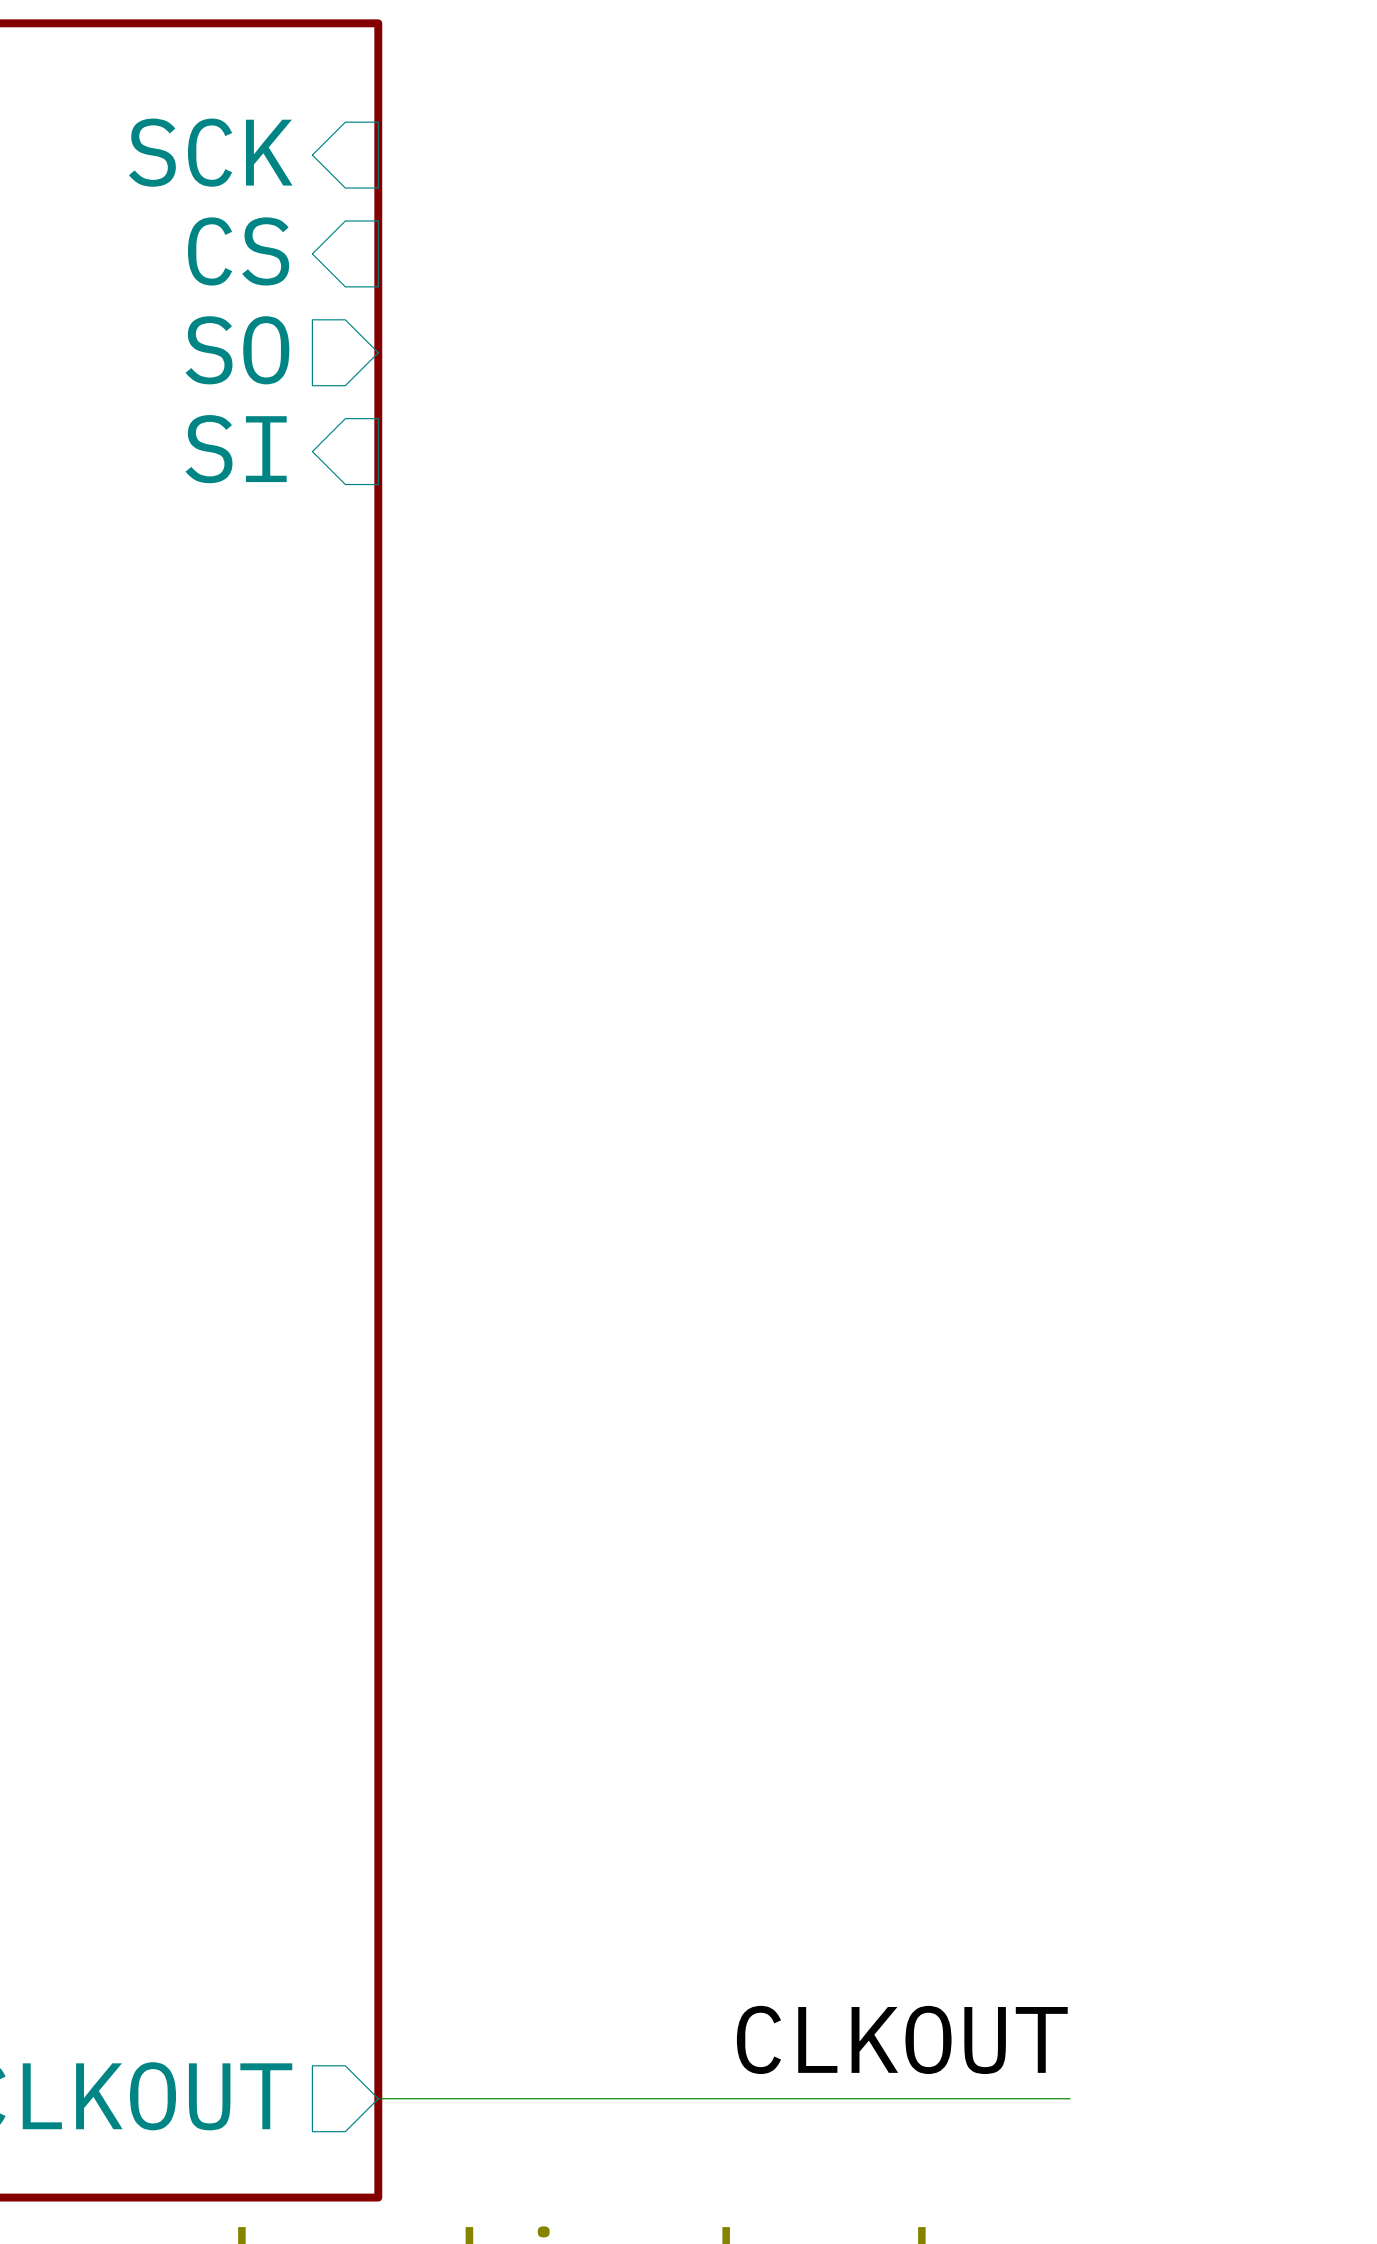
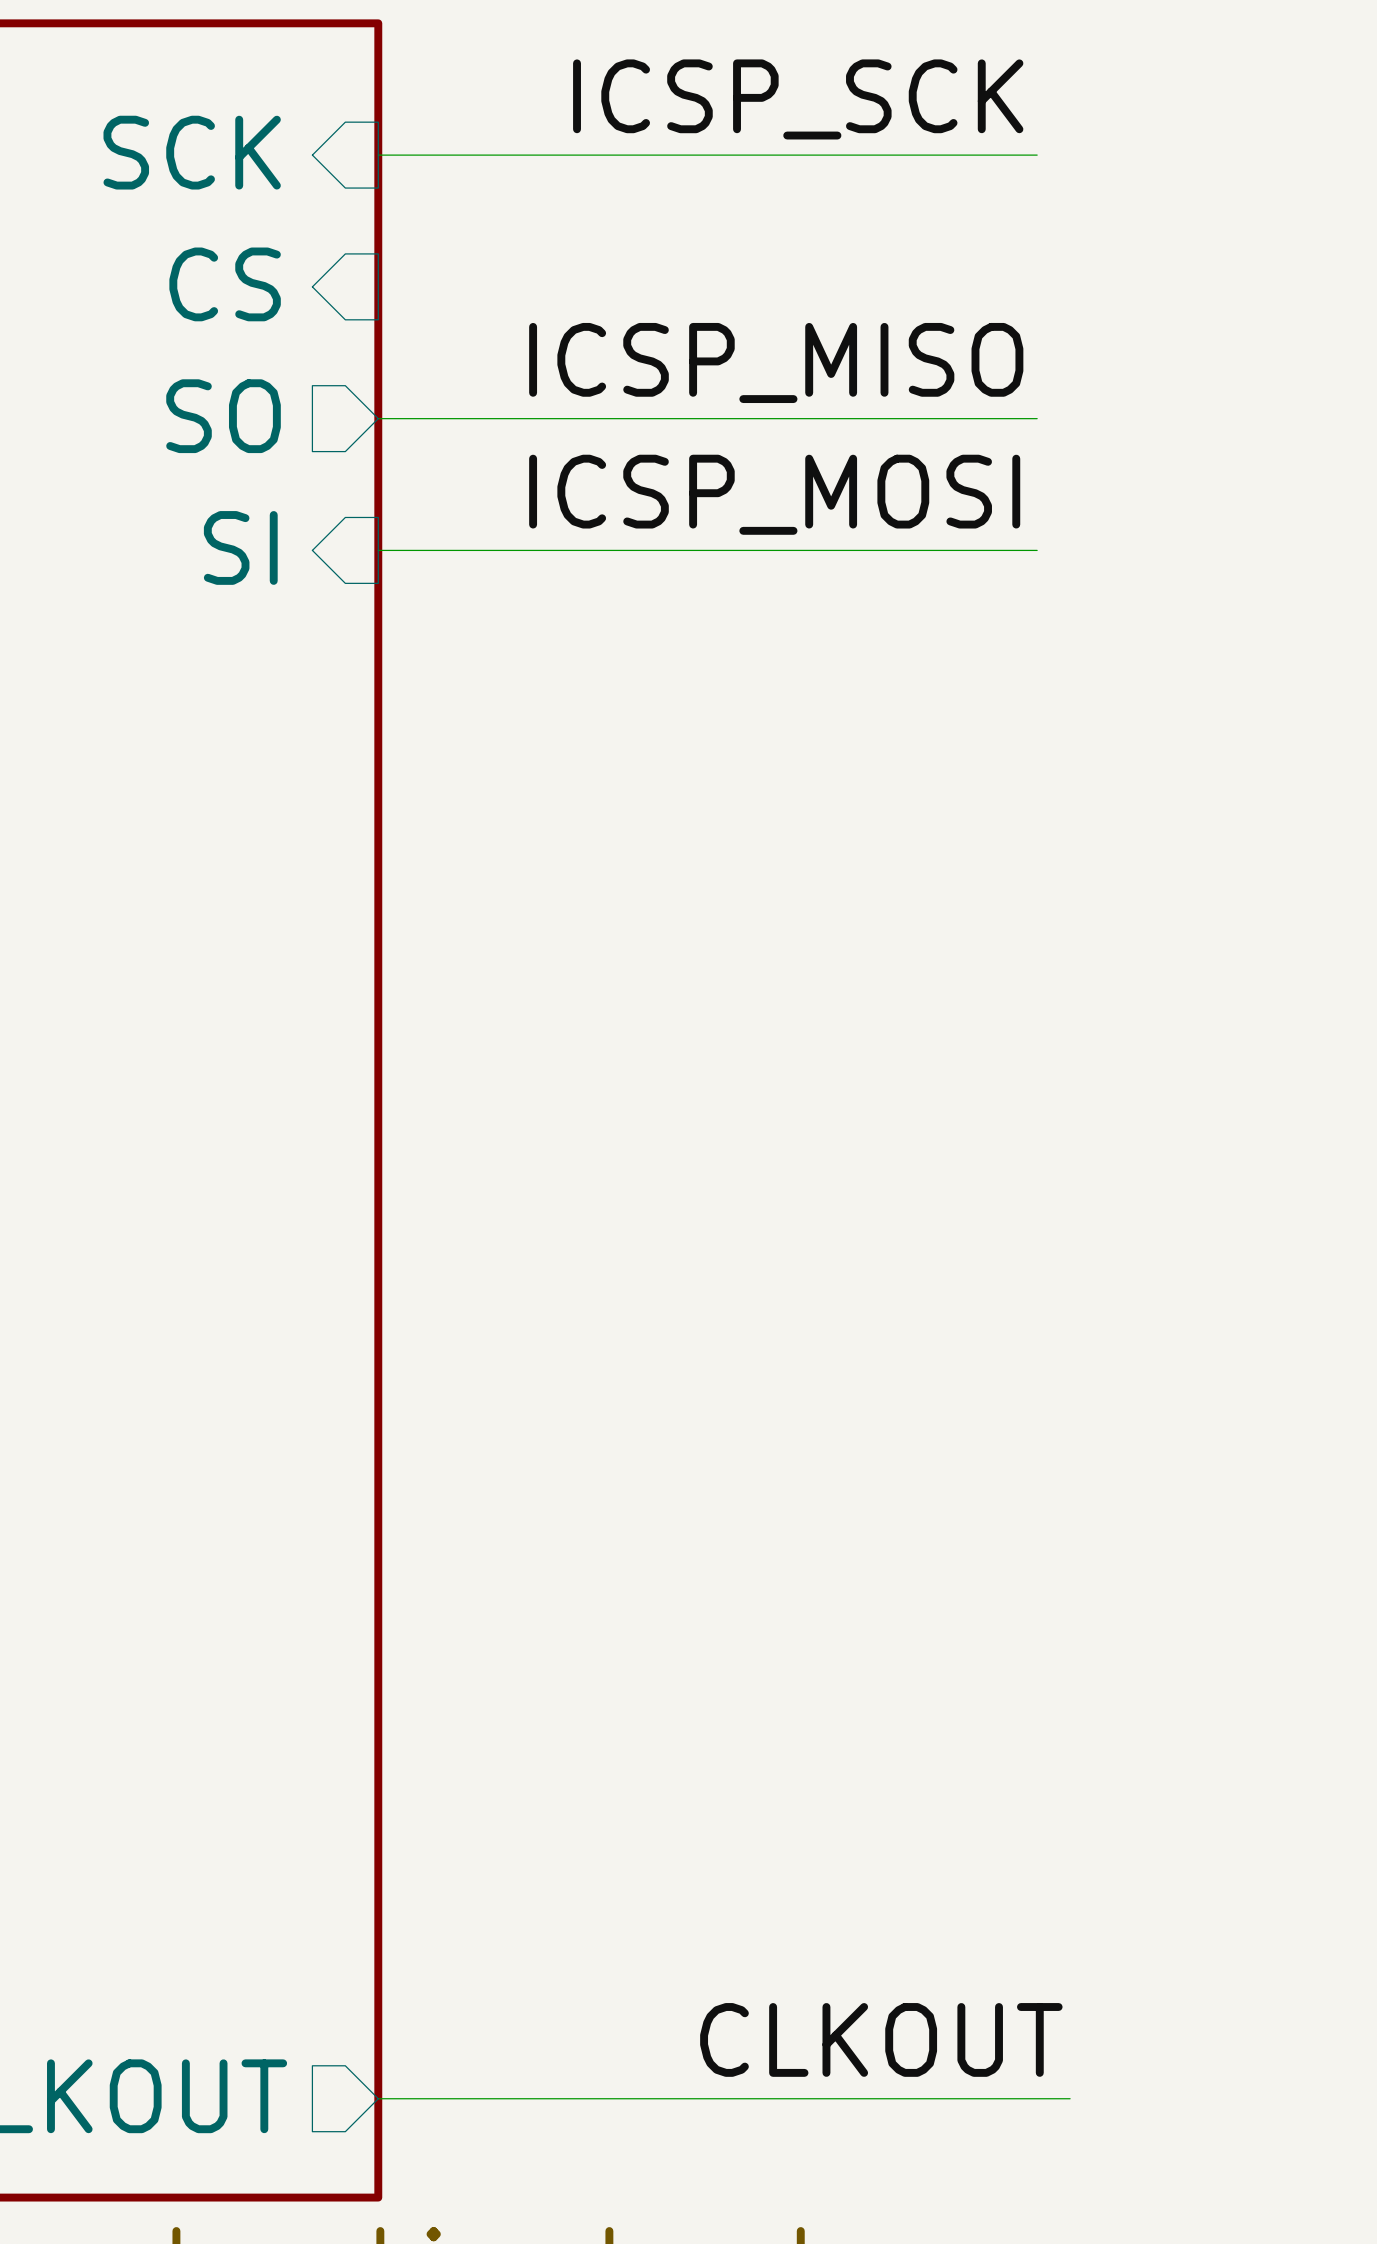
label: none -> ICSP_SCK (798, 99)
wire: none -> (378, 155) (1037, 155)
sheet pin position: CS (238, 251) -> CS (225, 284)
sheet pin position: SO (237, 350) -> SO (223, 416)
label: none -> ICSP_MISO (776, 362)
wire: none -> (378, 418) (1037, 418)
sheet pin position: SI (236, 449) -> SI (240, 547)
label: none -> ICSP_MOSI (774, 494)
wire: none -> (378, 550) (1037, 550)

